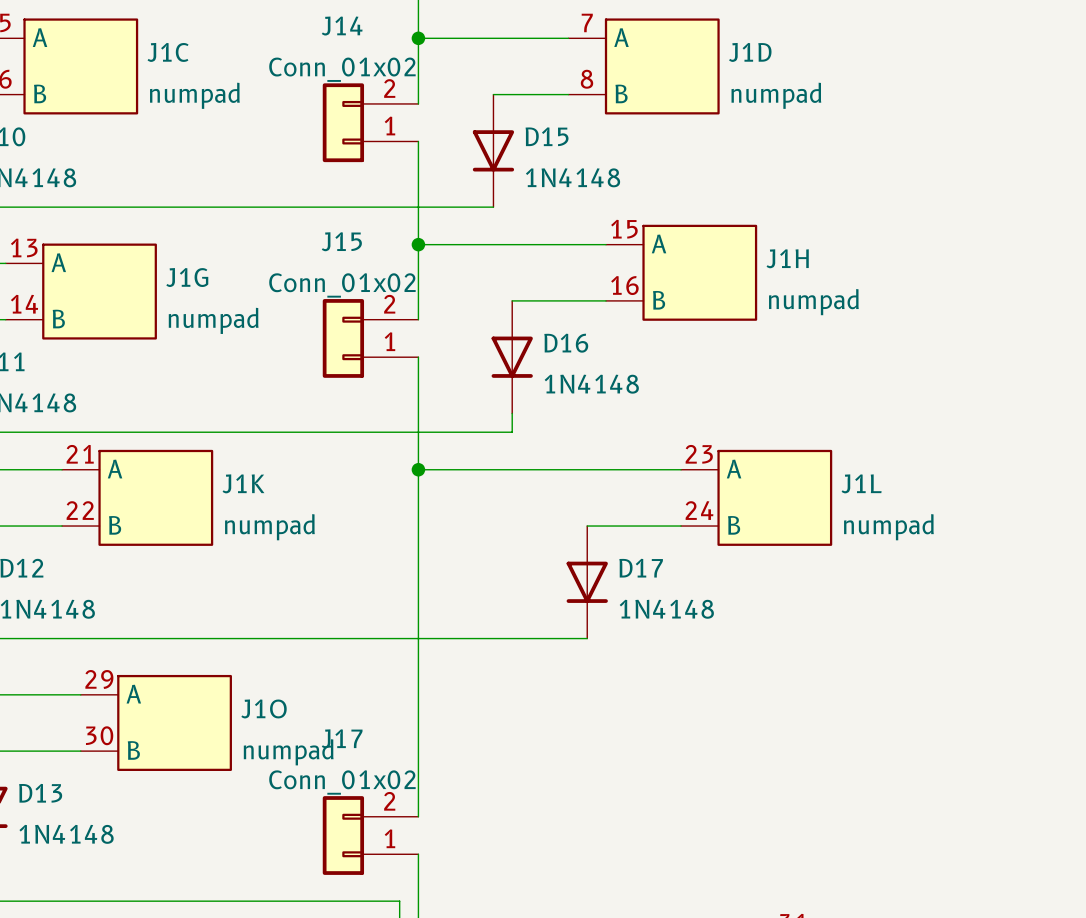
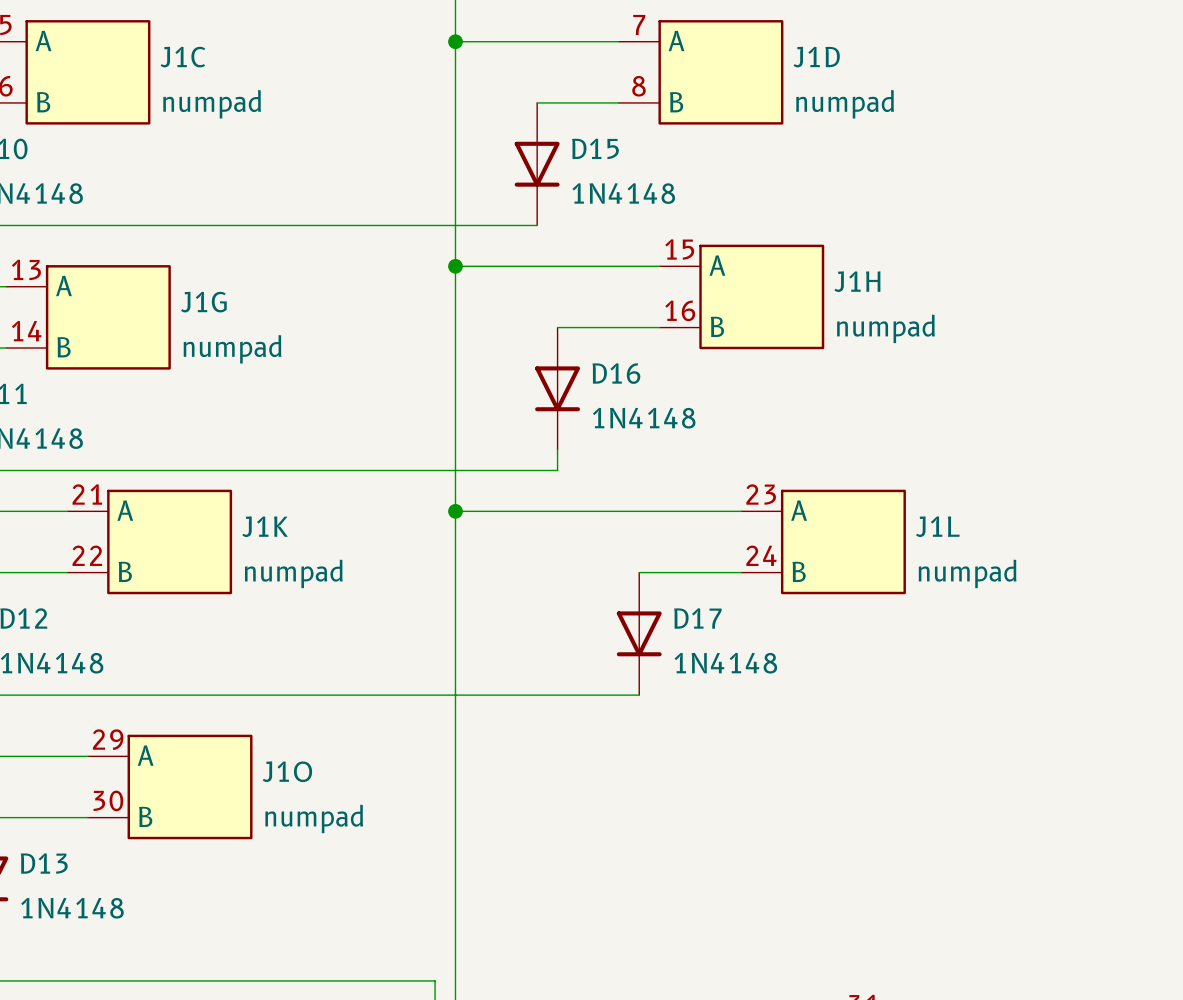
wire: none -> (455, 113) (455, 154)
J14: Conn_01x02 (370, 122) -> none
wire: none -> (455, 347) (455, 388)
J15: Conn_01x02 (370, 338) -> none
wire: none -> (455, 889) (455, 929)
J17: Conn_01x02 (370, 835) -> none

